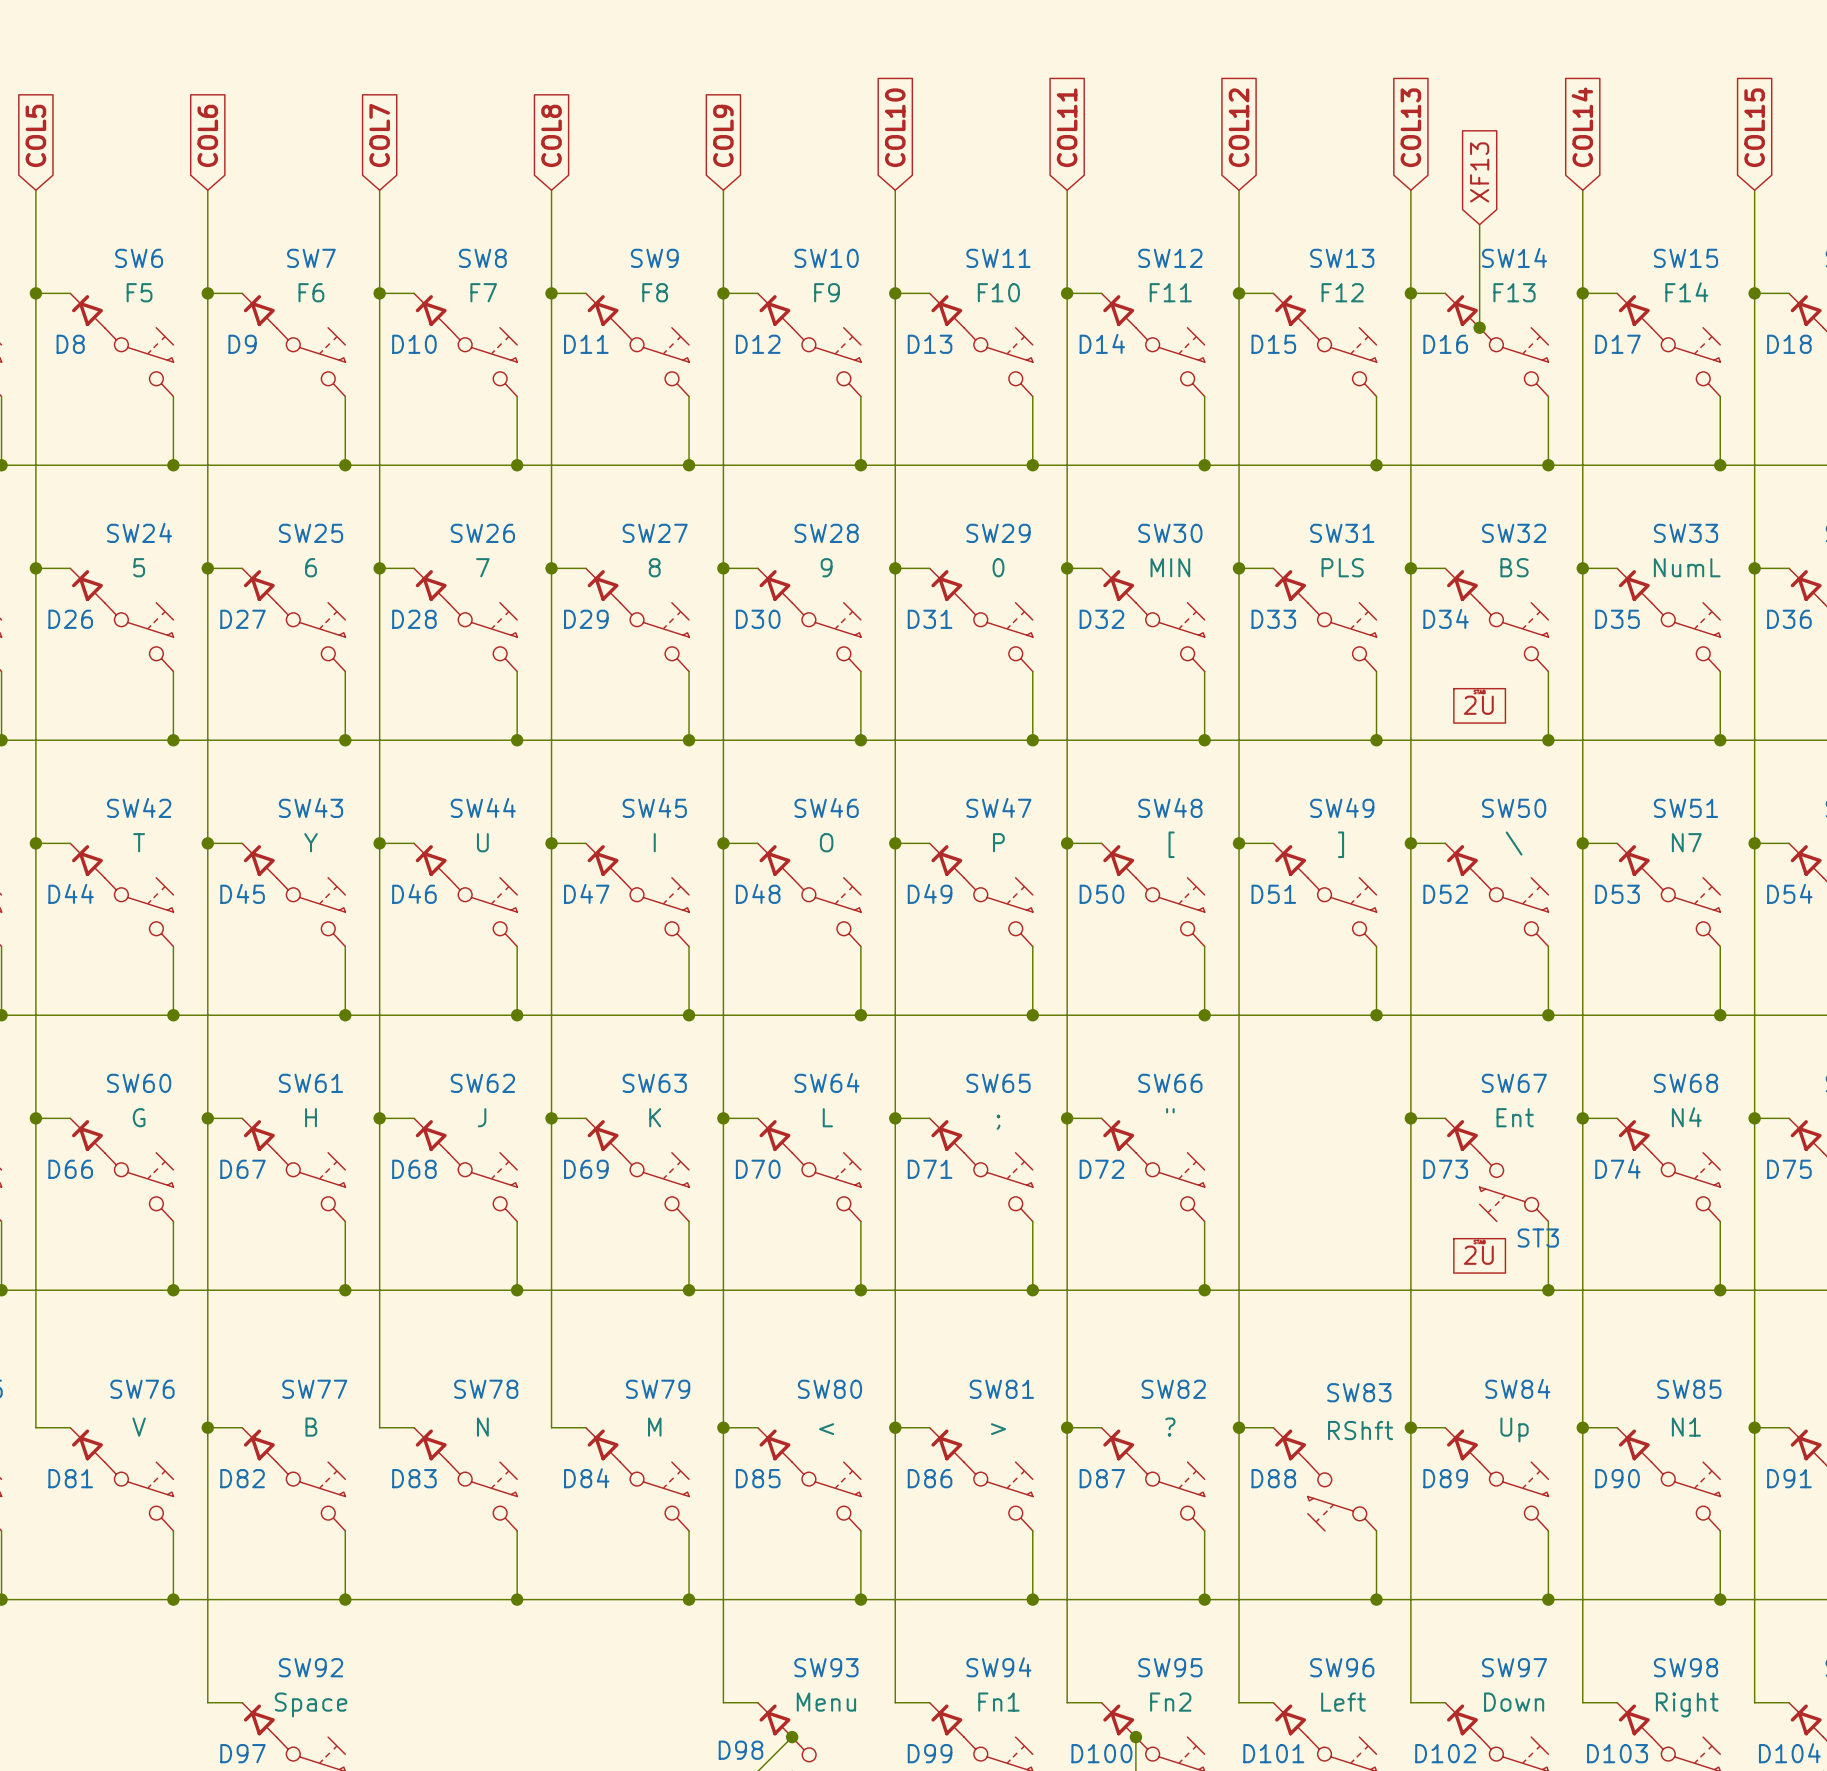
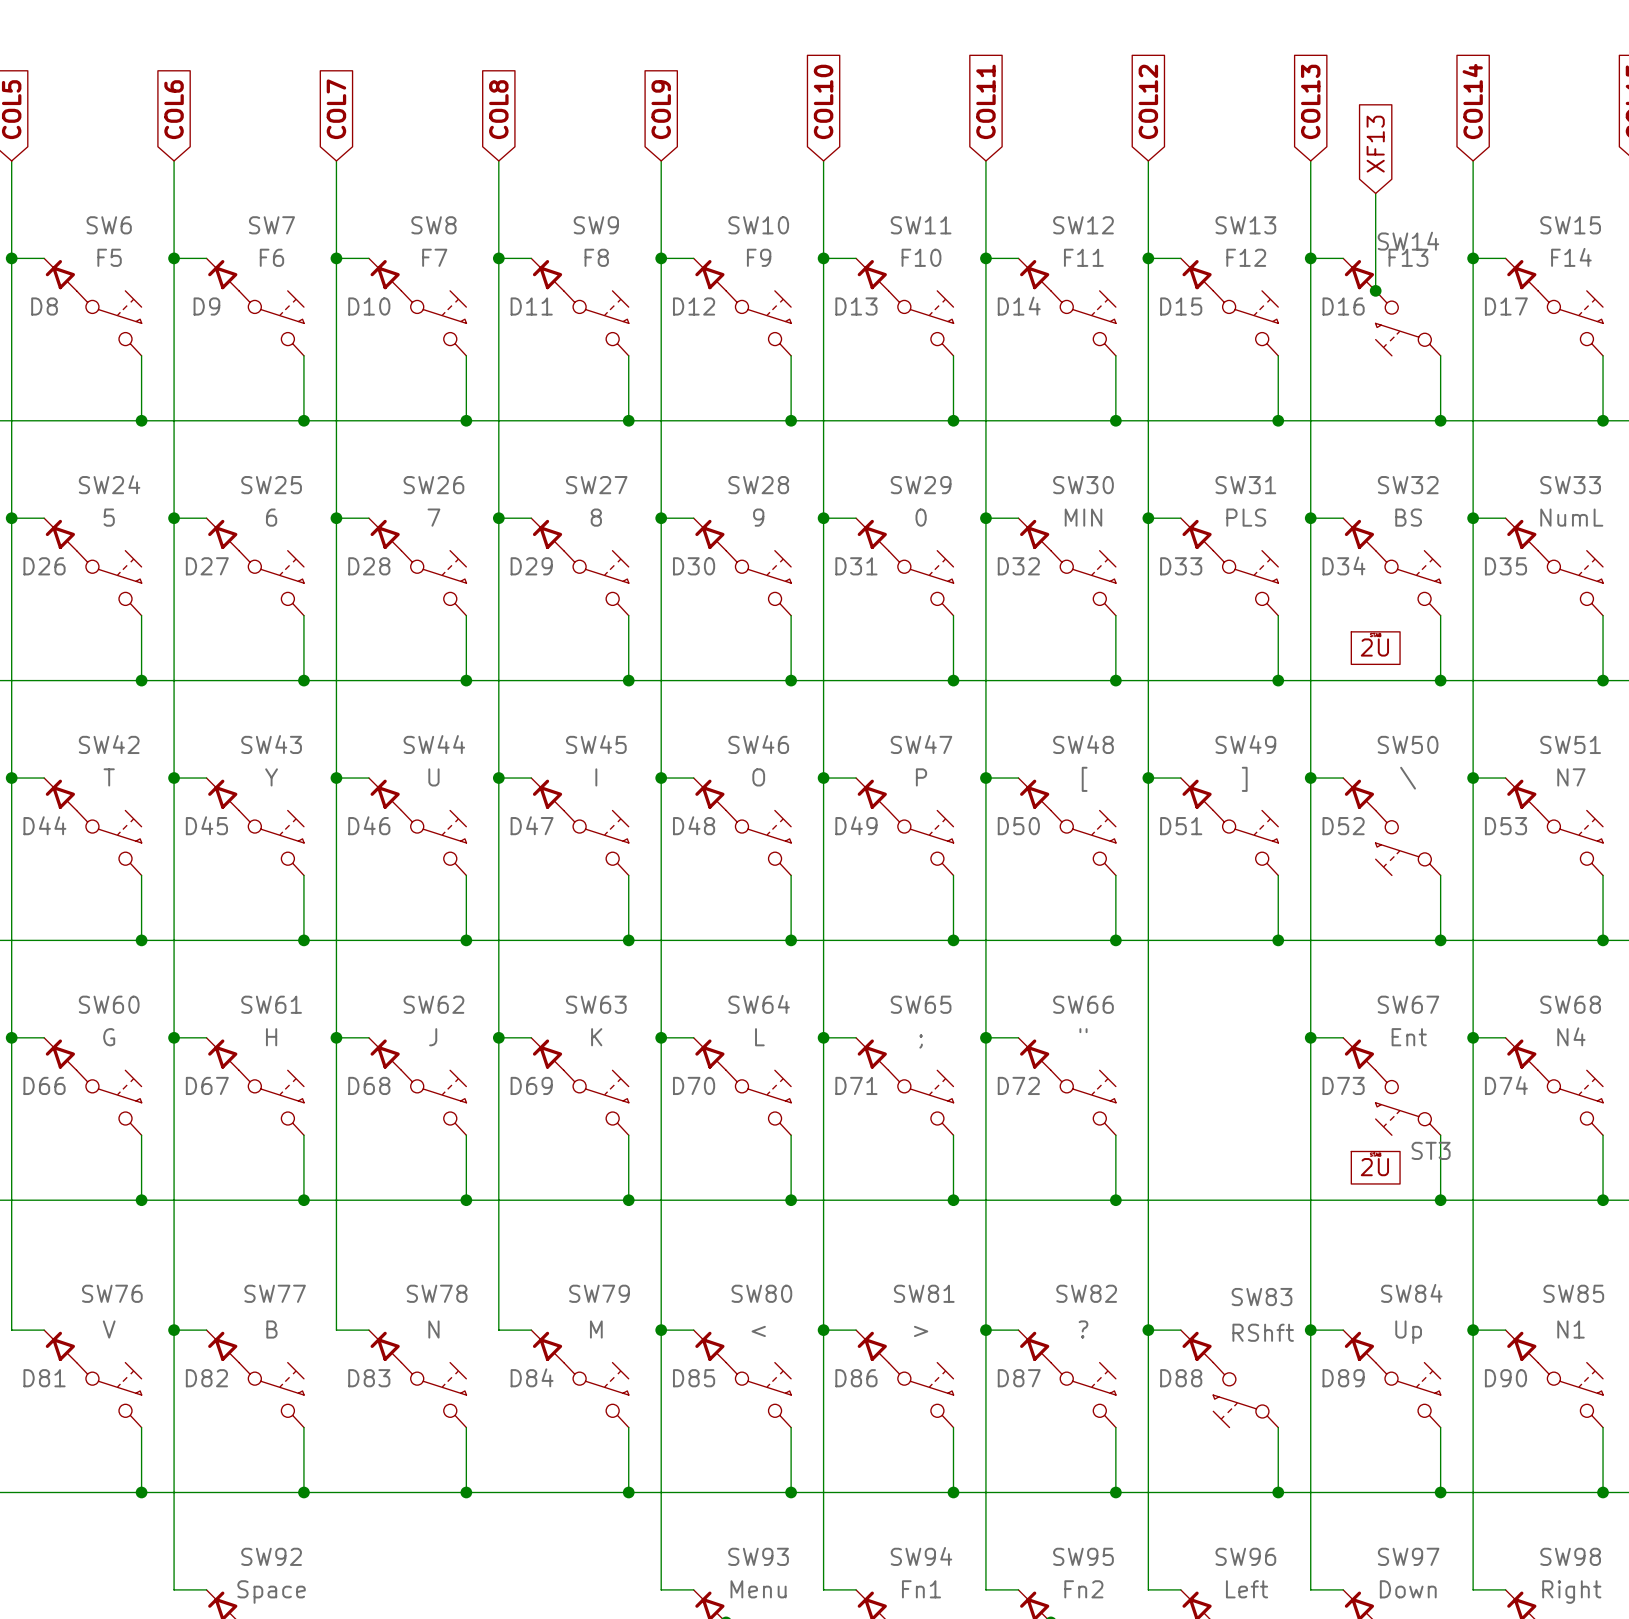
SW14 rotation: 0° (1514, 362) -> 180° (1408, 323)
SW50 rotation: 0° (1514, 912) -> 180° (1408, 842)

